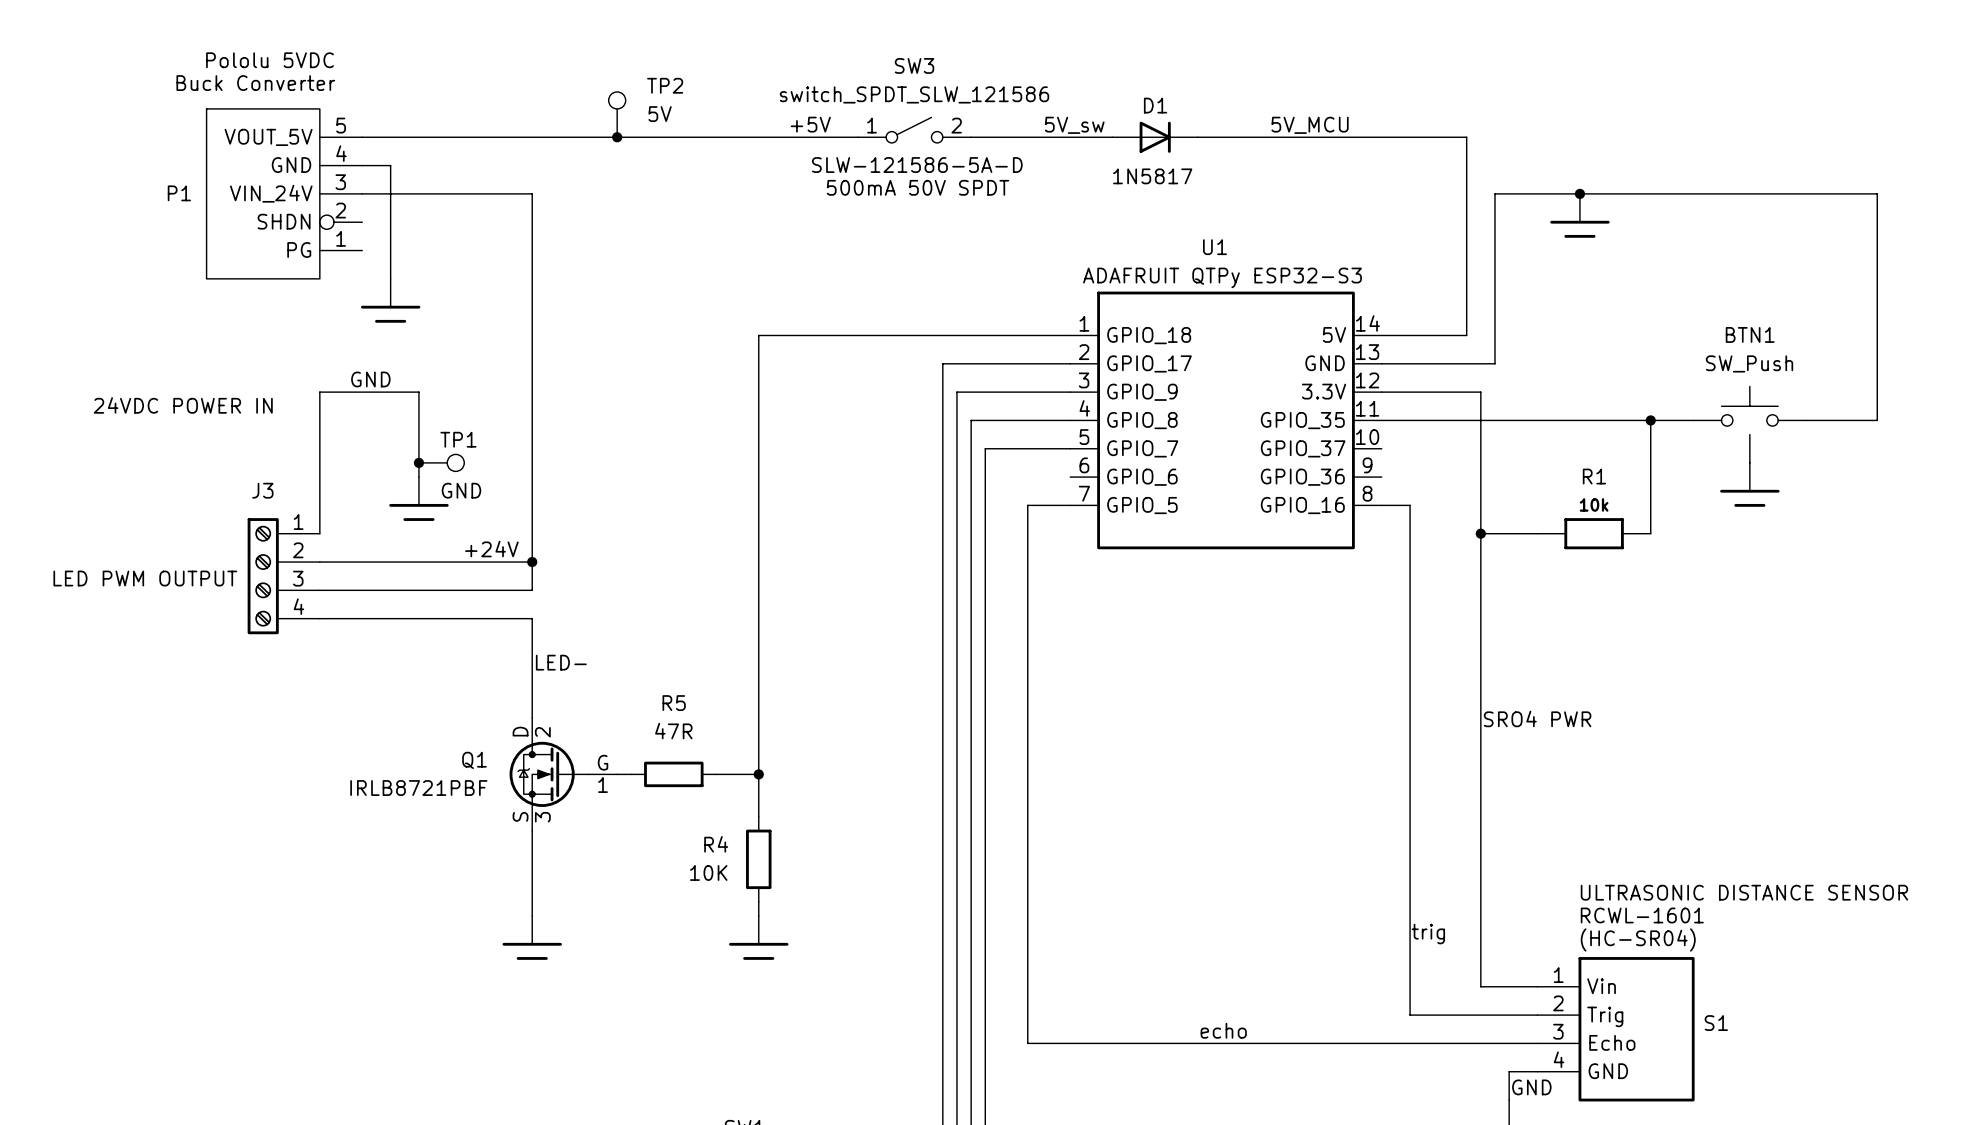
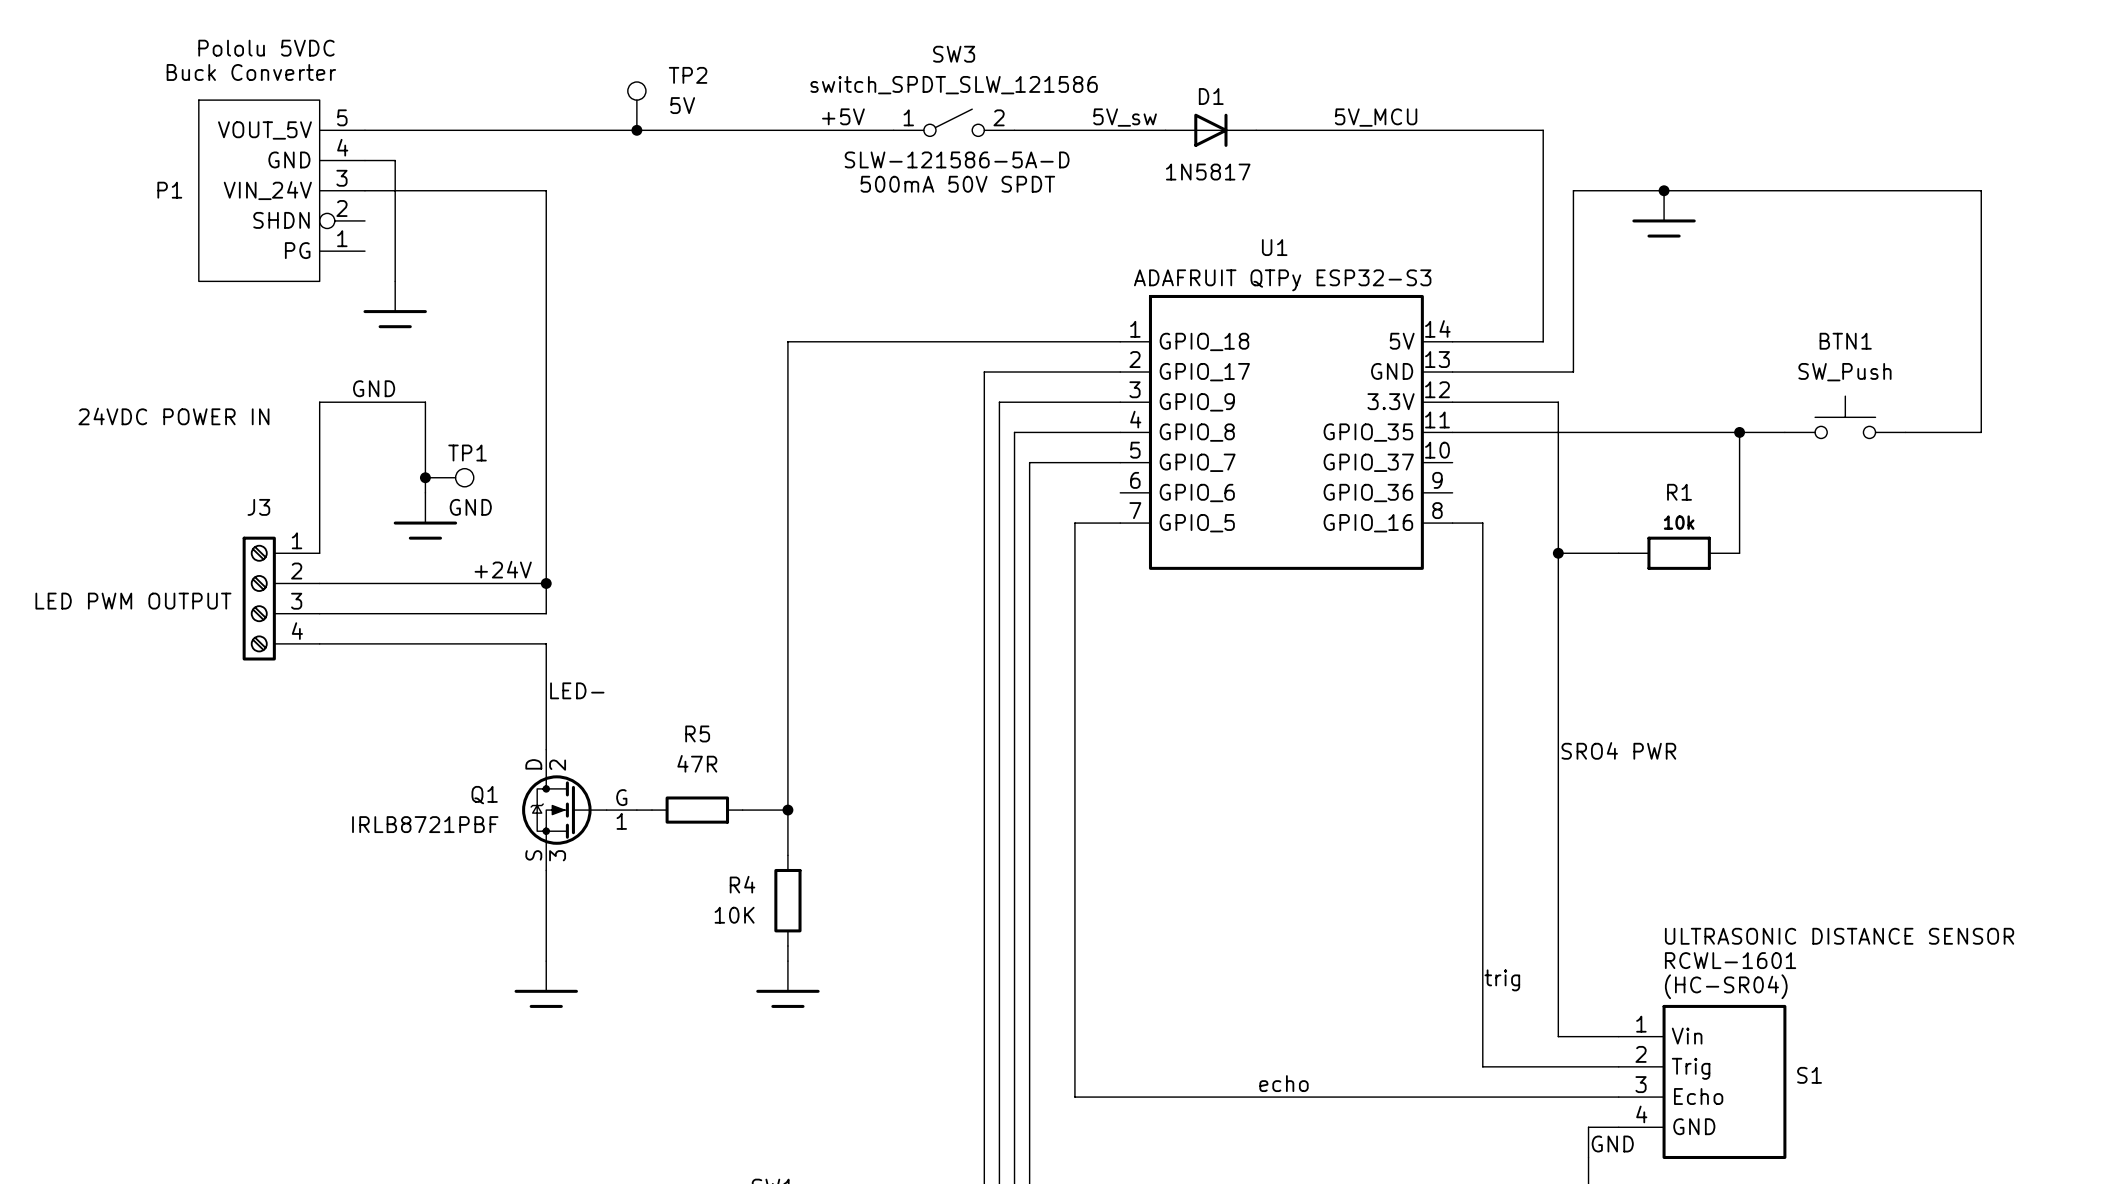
BTN1 symbol: [1693, 386, 1807, 463] -> [1784, 396, 1906, 439]
power symbol: (1749, 484) -> none

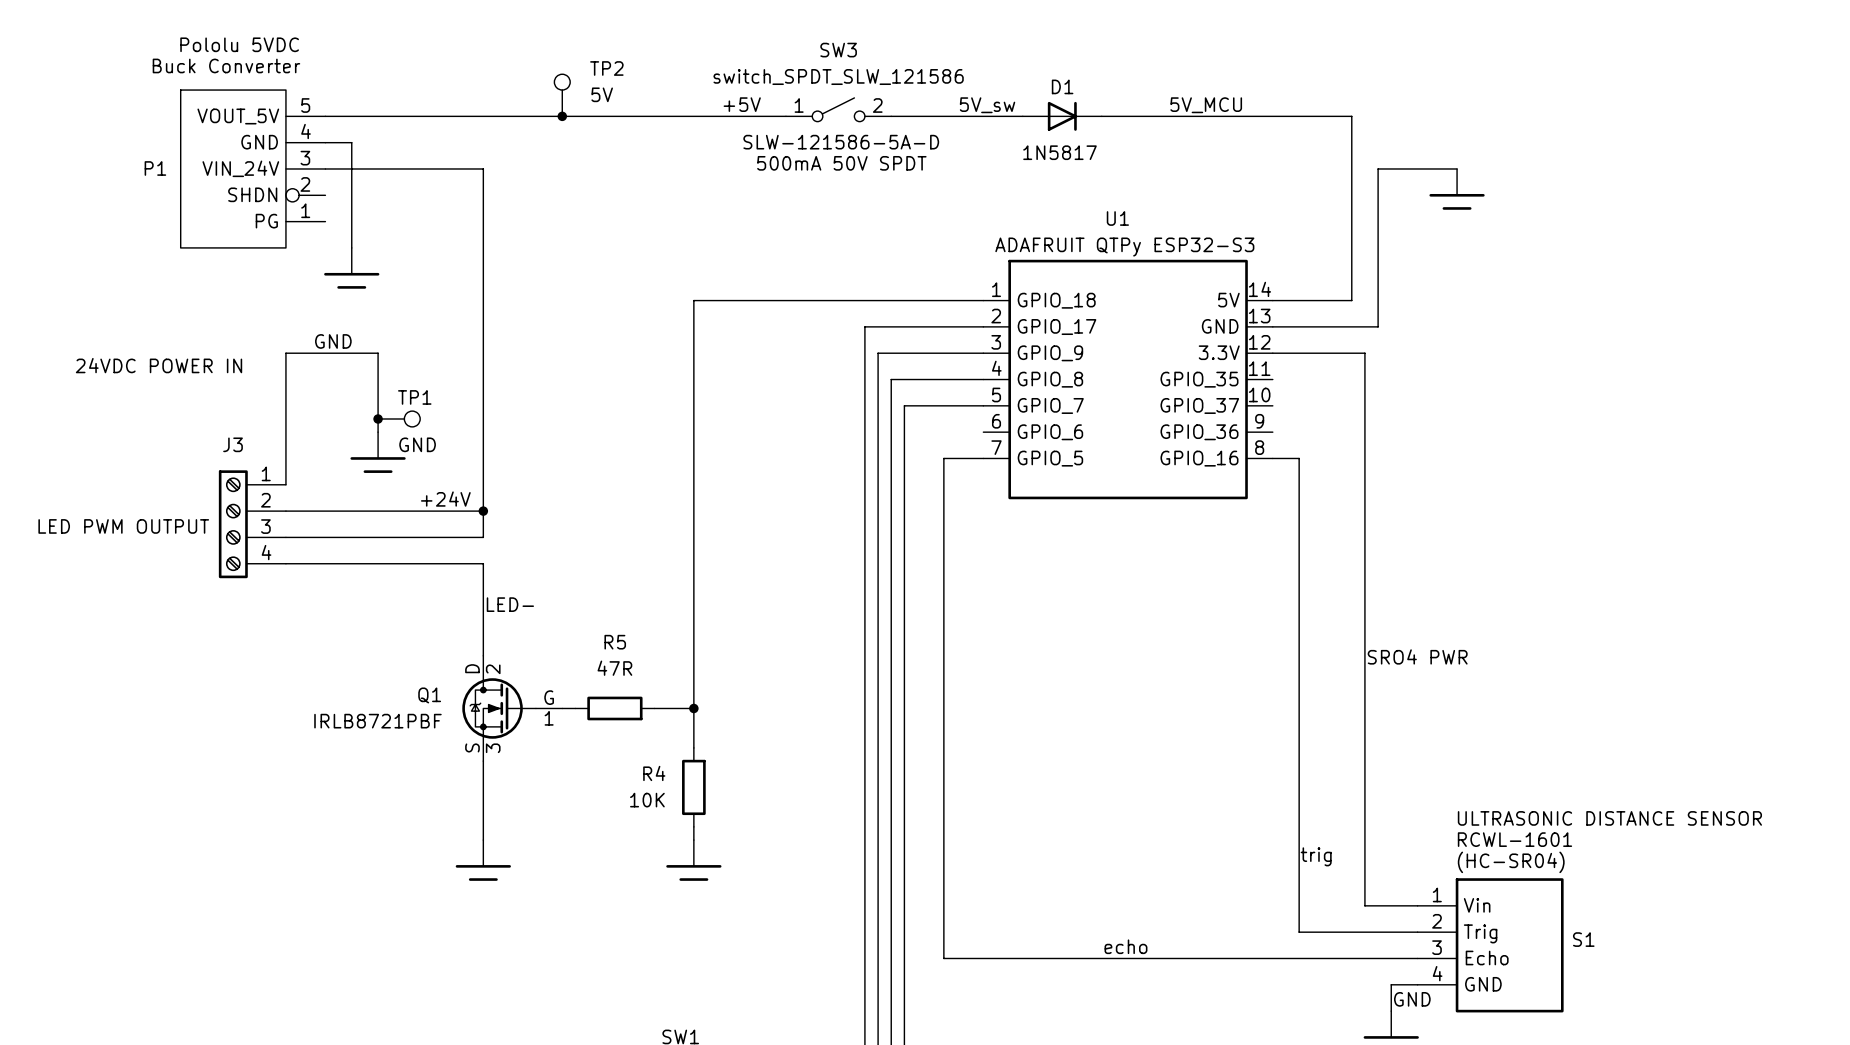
wire: (1664, 190) (1981, 190) (1981, 432) (1905, 432) -> none
junction: (1664, 190) -> none
BTN1: SW_Push (1845, 417) -> none
wire: (1452, 432) (1784, 432) -> none
wire: (1739, 432) (1739, 553) -> none
junction: (1739, 432) -> none
wire: (1558, 553) (1618, 553) -> none
junction: (1558, 553) -> none
R1: 10k (1679, 553) -> none

